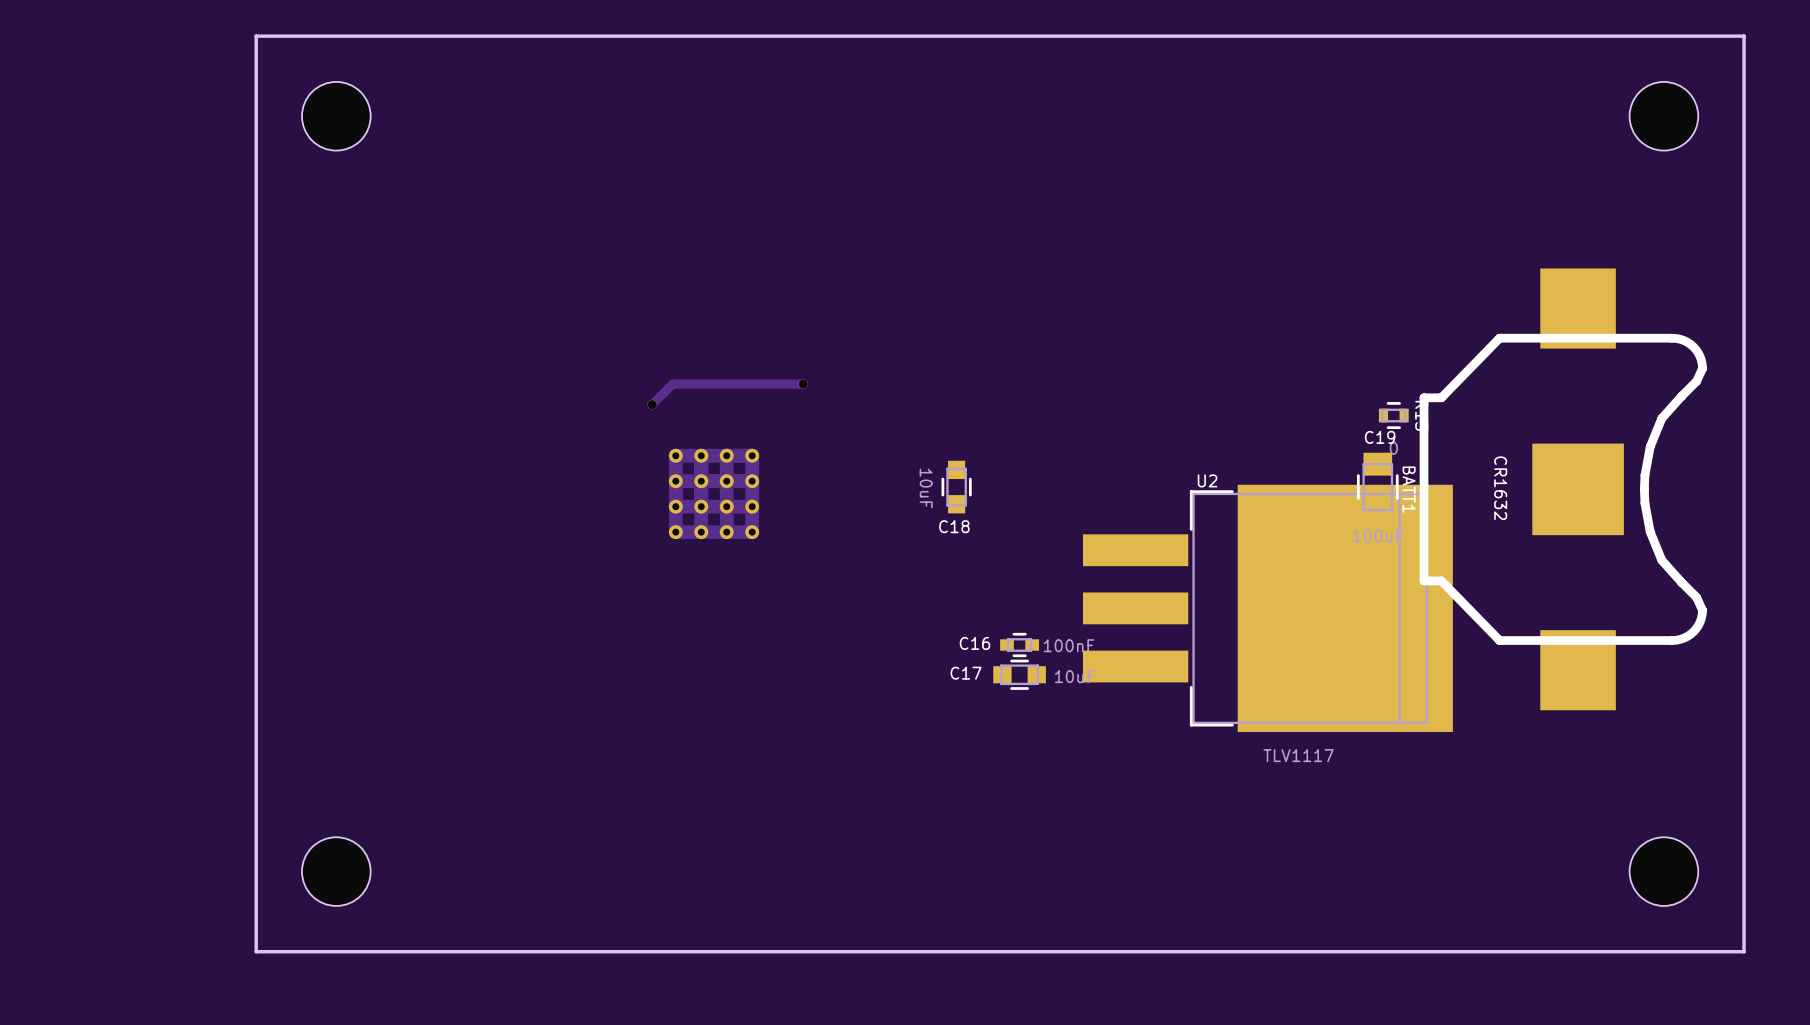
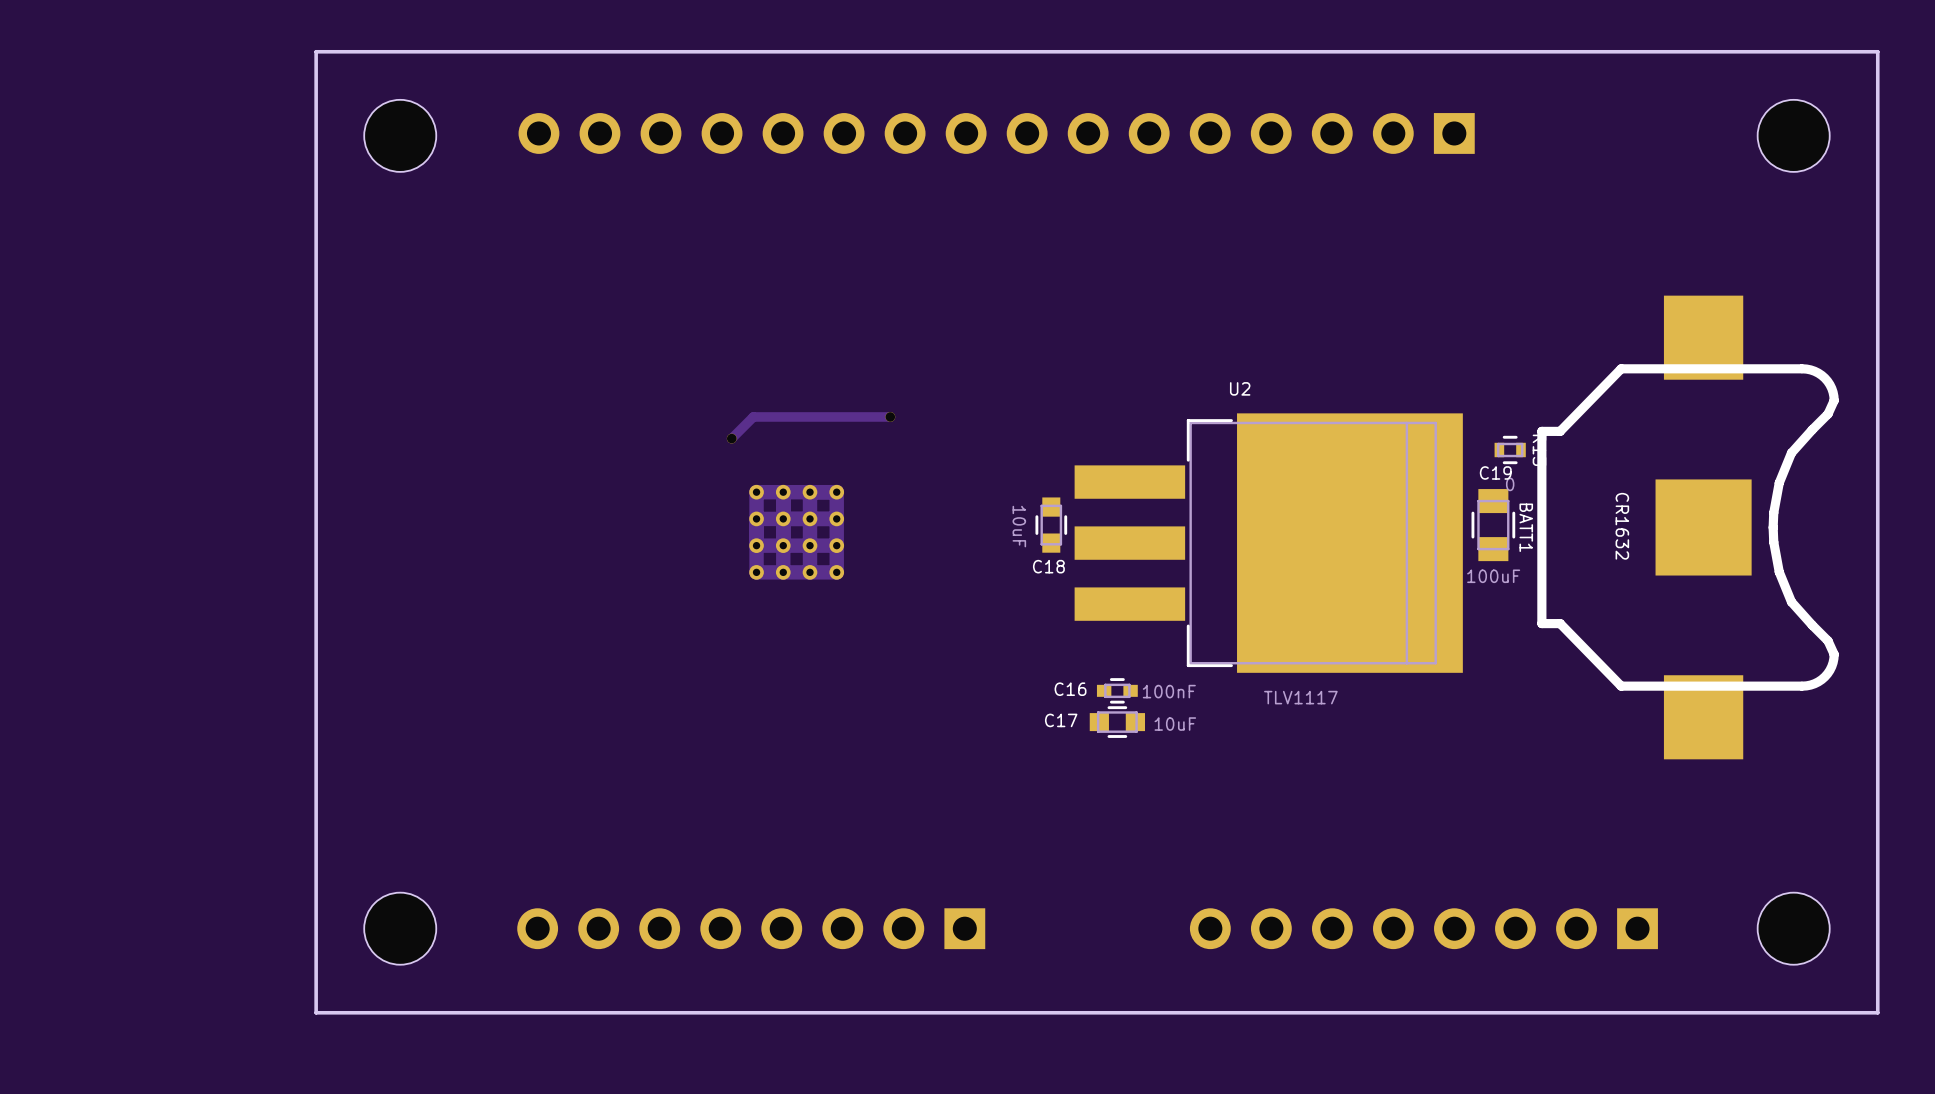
part: none -> (996, 133)
U2 name position: U2 (1207, 480) -> U2 (1240, 388)
U2 position: (1267, 608) -> (1268, 543)
part: none -> (751, 928)
part: none -> (1423, 928)

